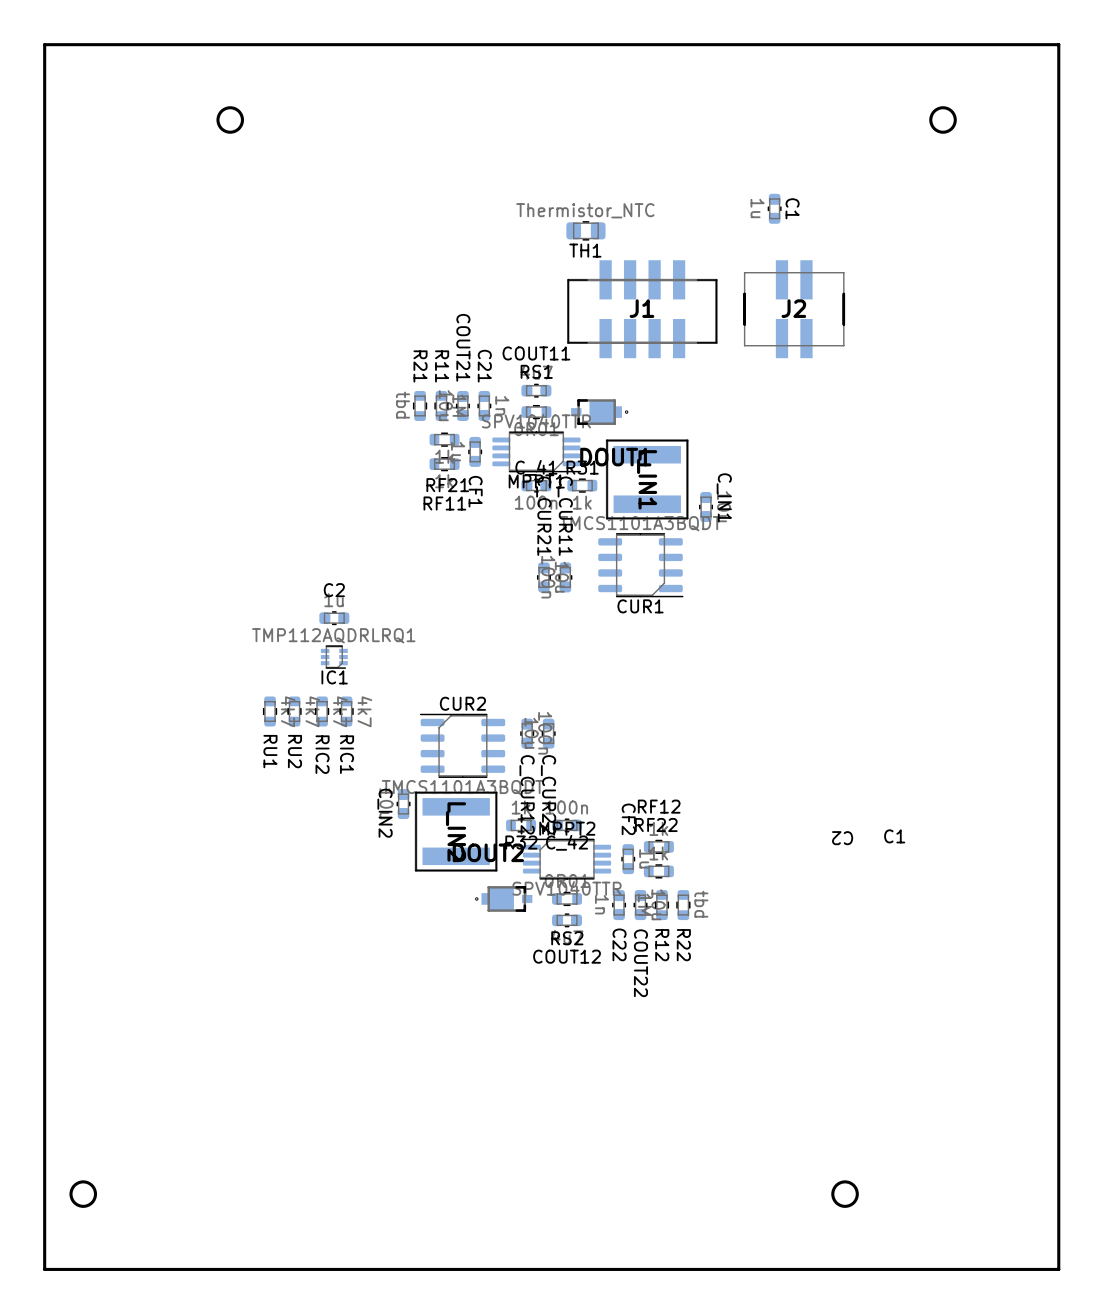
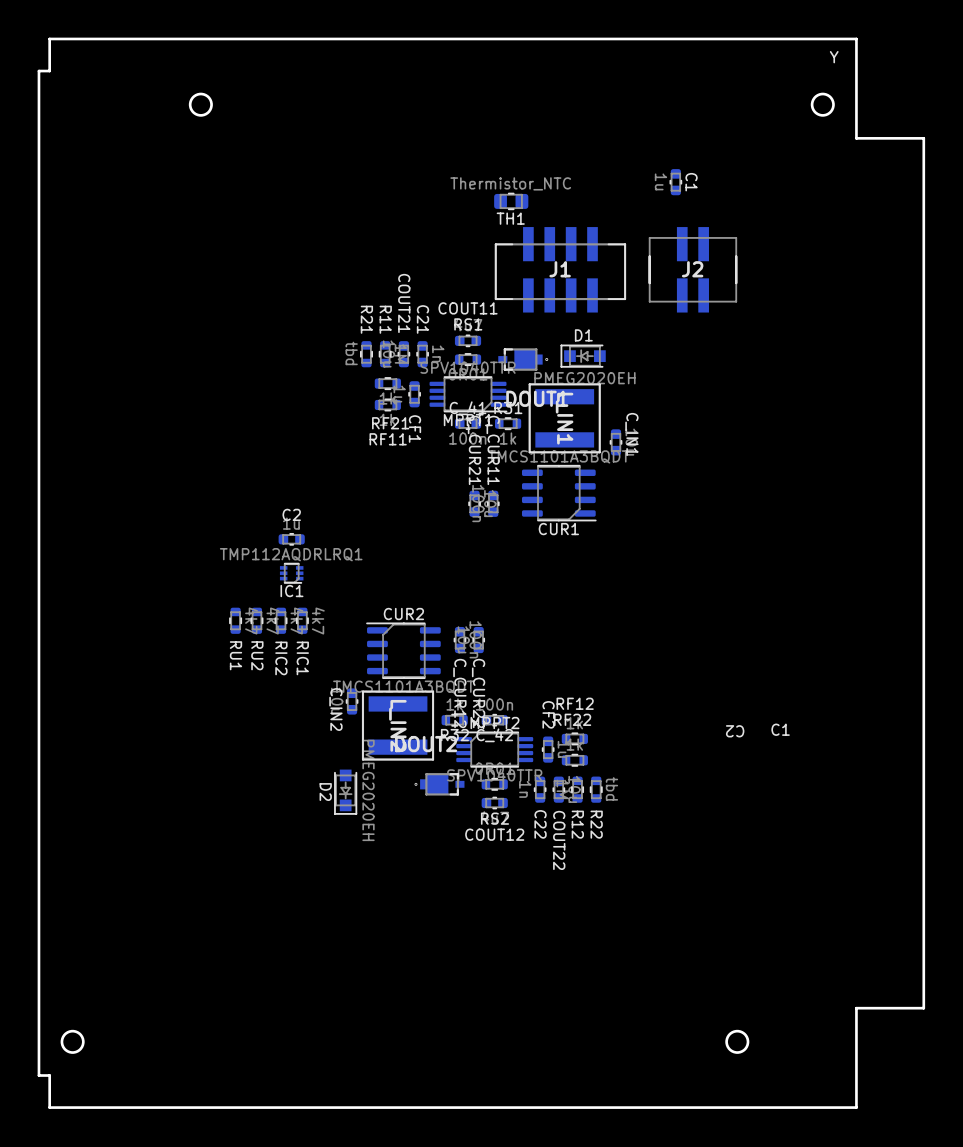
drawing shape: [43, 43, 1061, 1271] -> [37, 37, 926, 1109]
text: none -> Y (834, 57)
D1: none -> PMEG2020EH (583, 356)
D2: none -> PMEG2020EH (345, 792)

